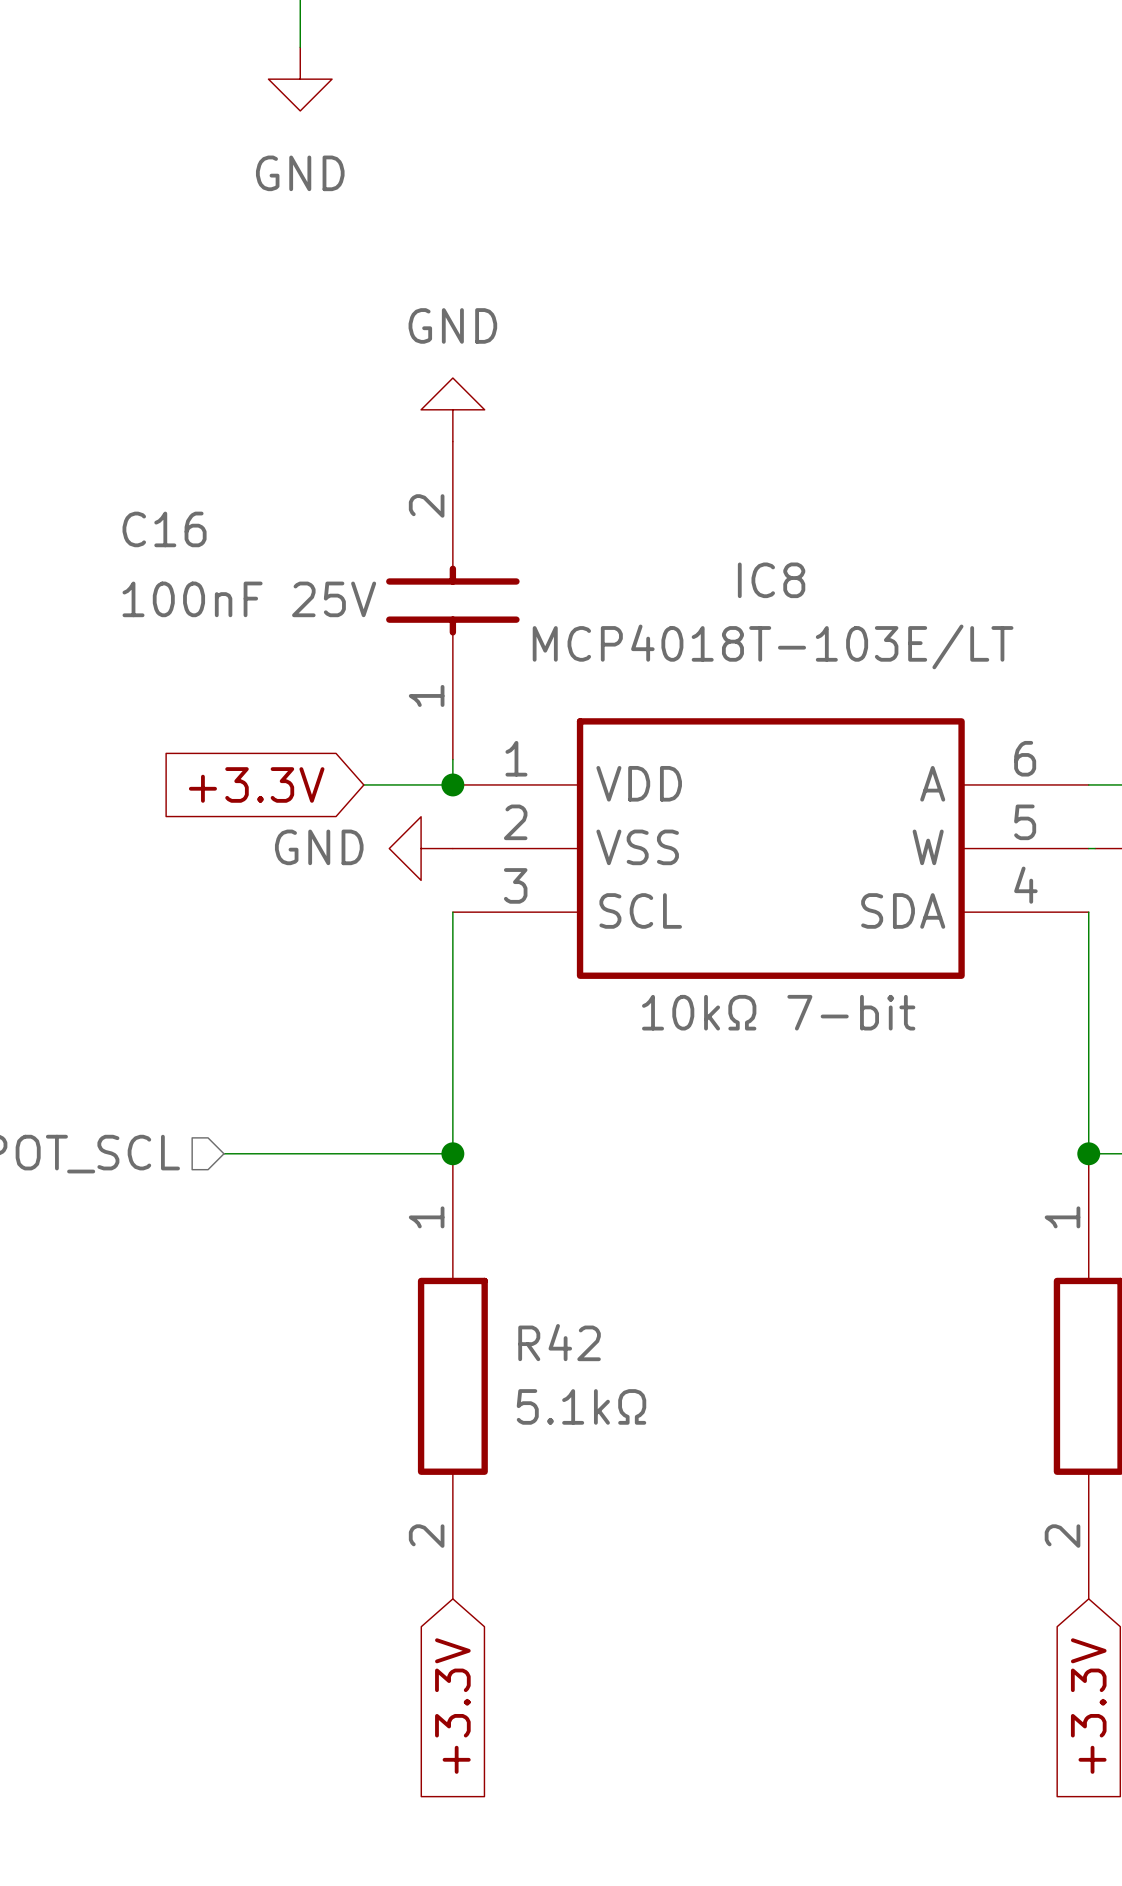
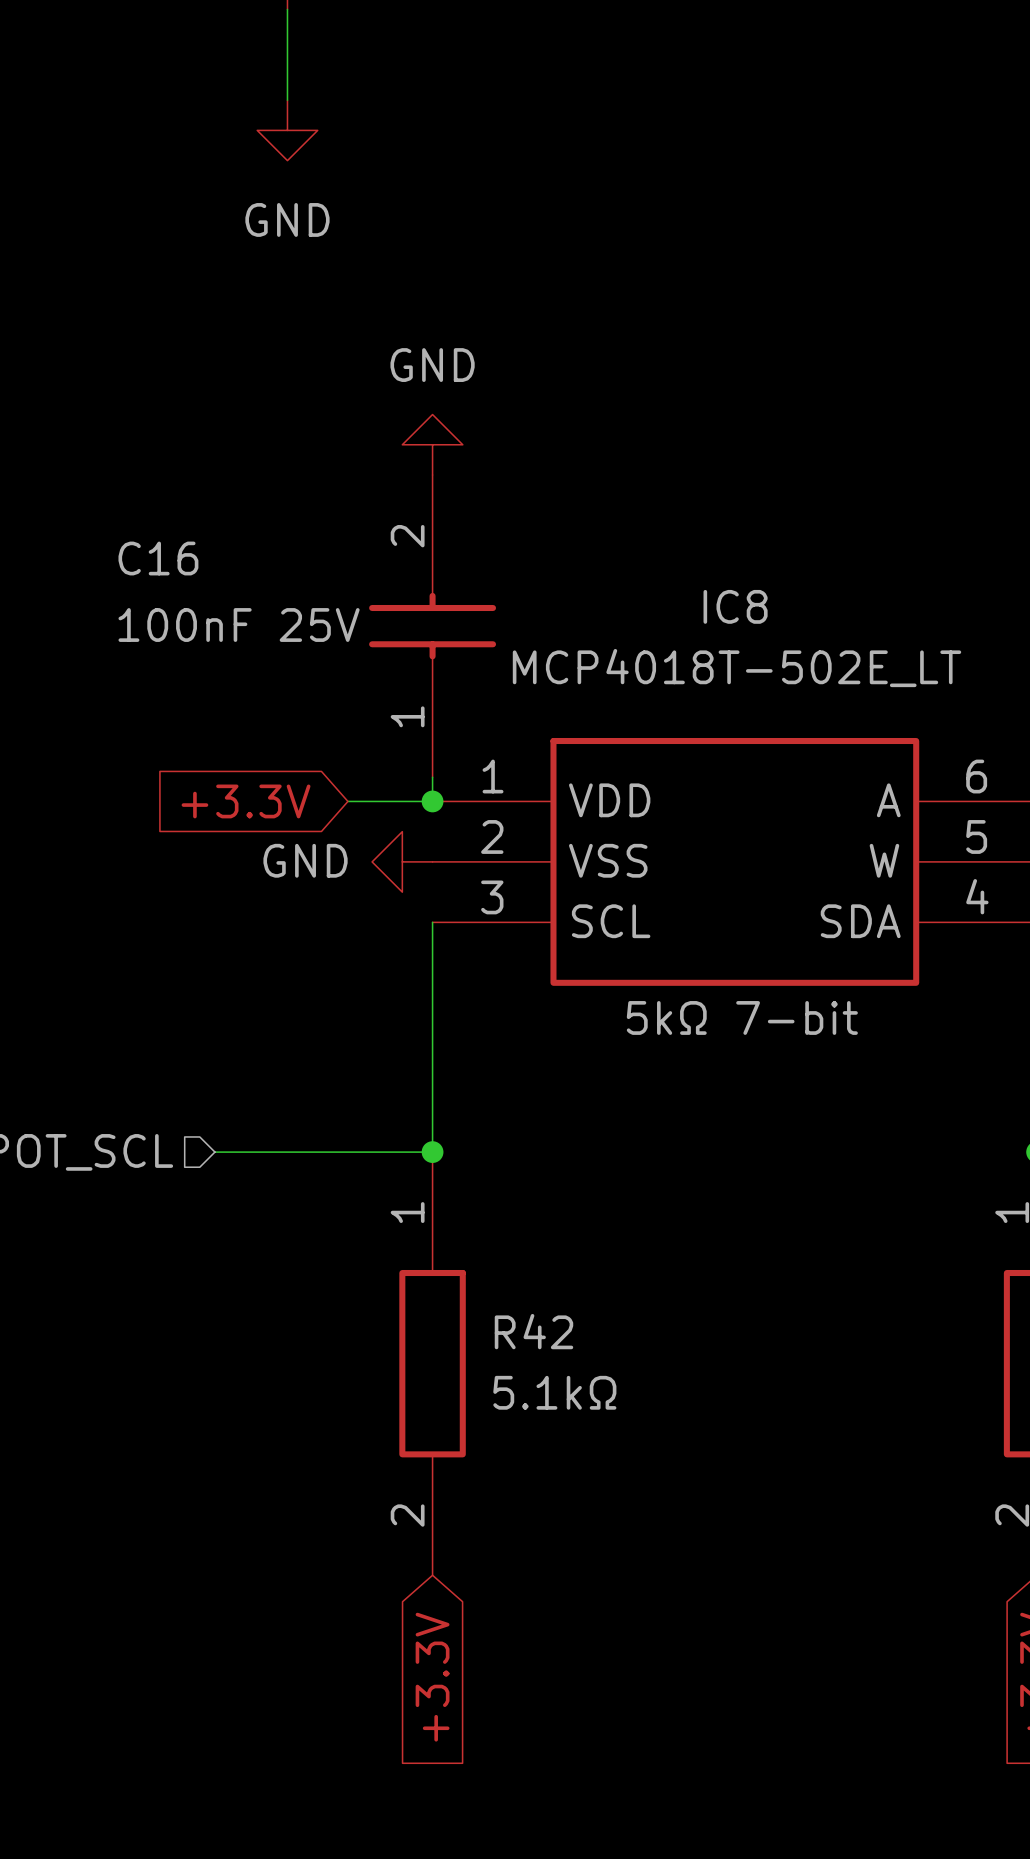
IC8 value: MCP4018T-103E/LT (773, 646) -> MCP4018T-502E_LT (737, 668)
IC8 text: 10kΩ 7-bit (778, 1012) -> 5kΩ 7-bit (742, 1017)

